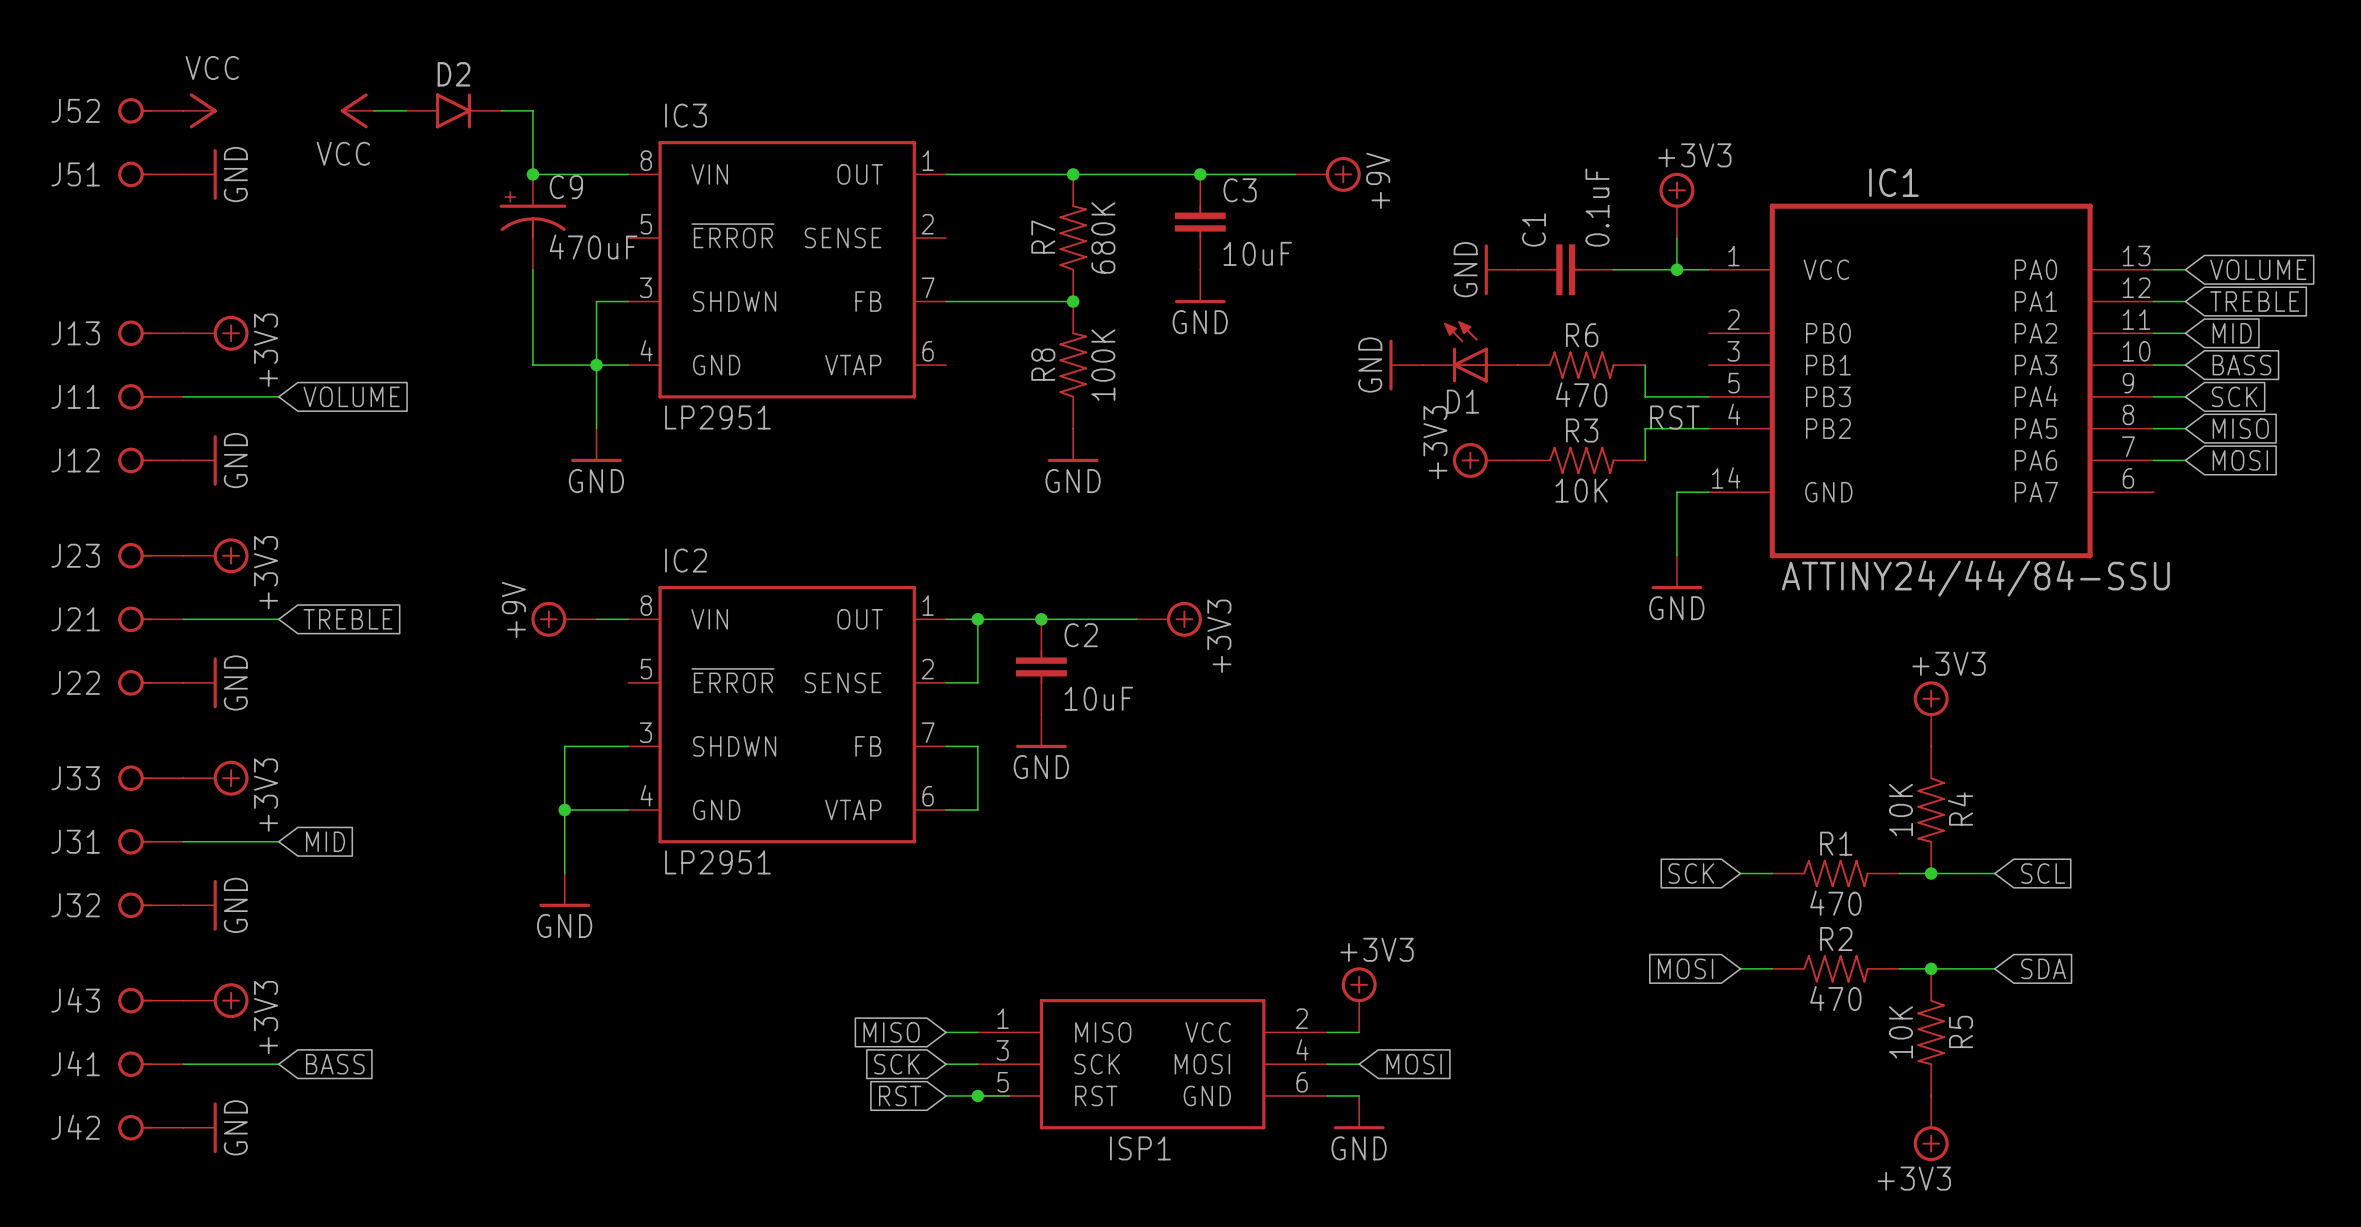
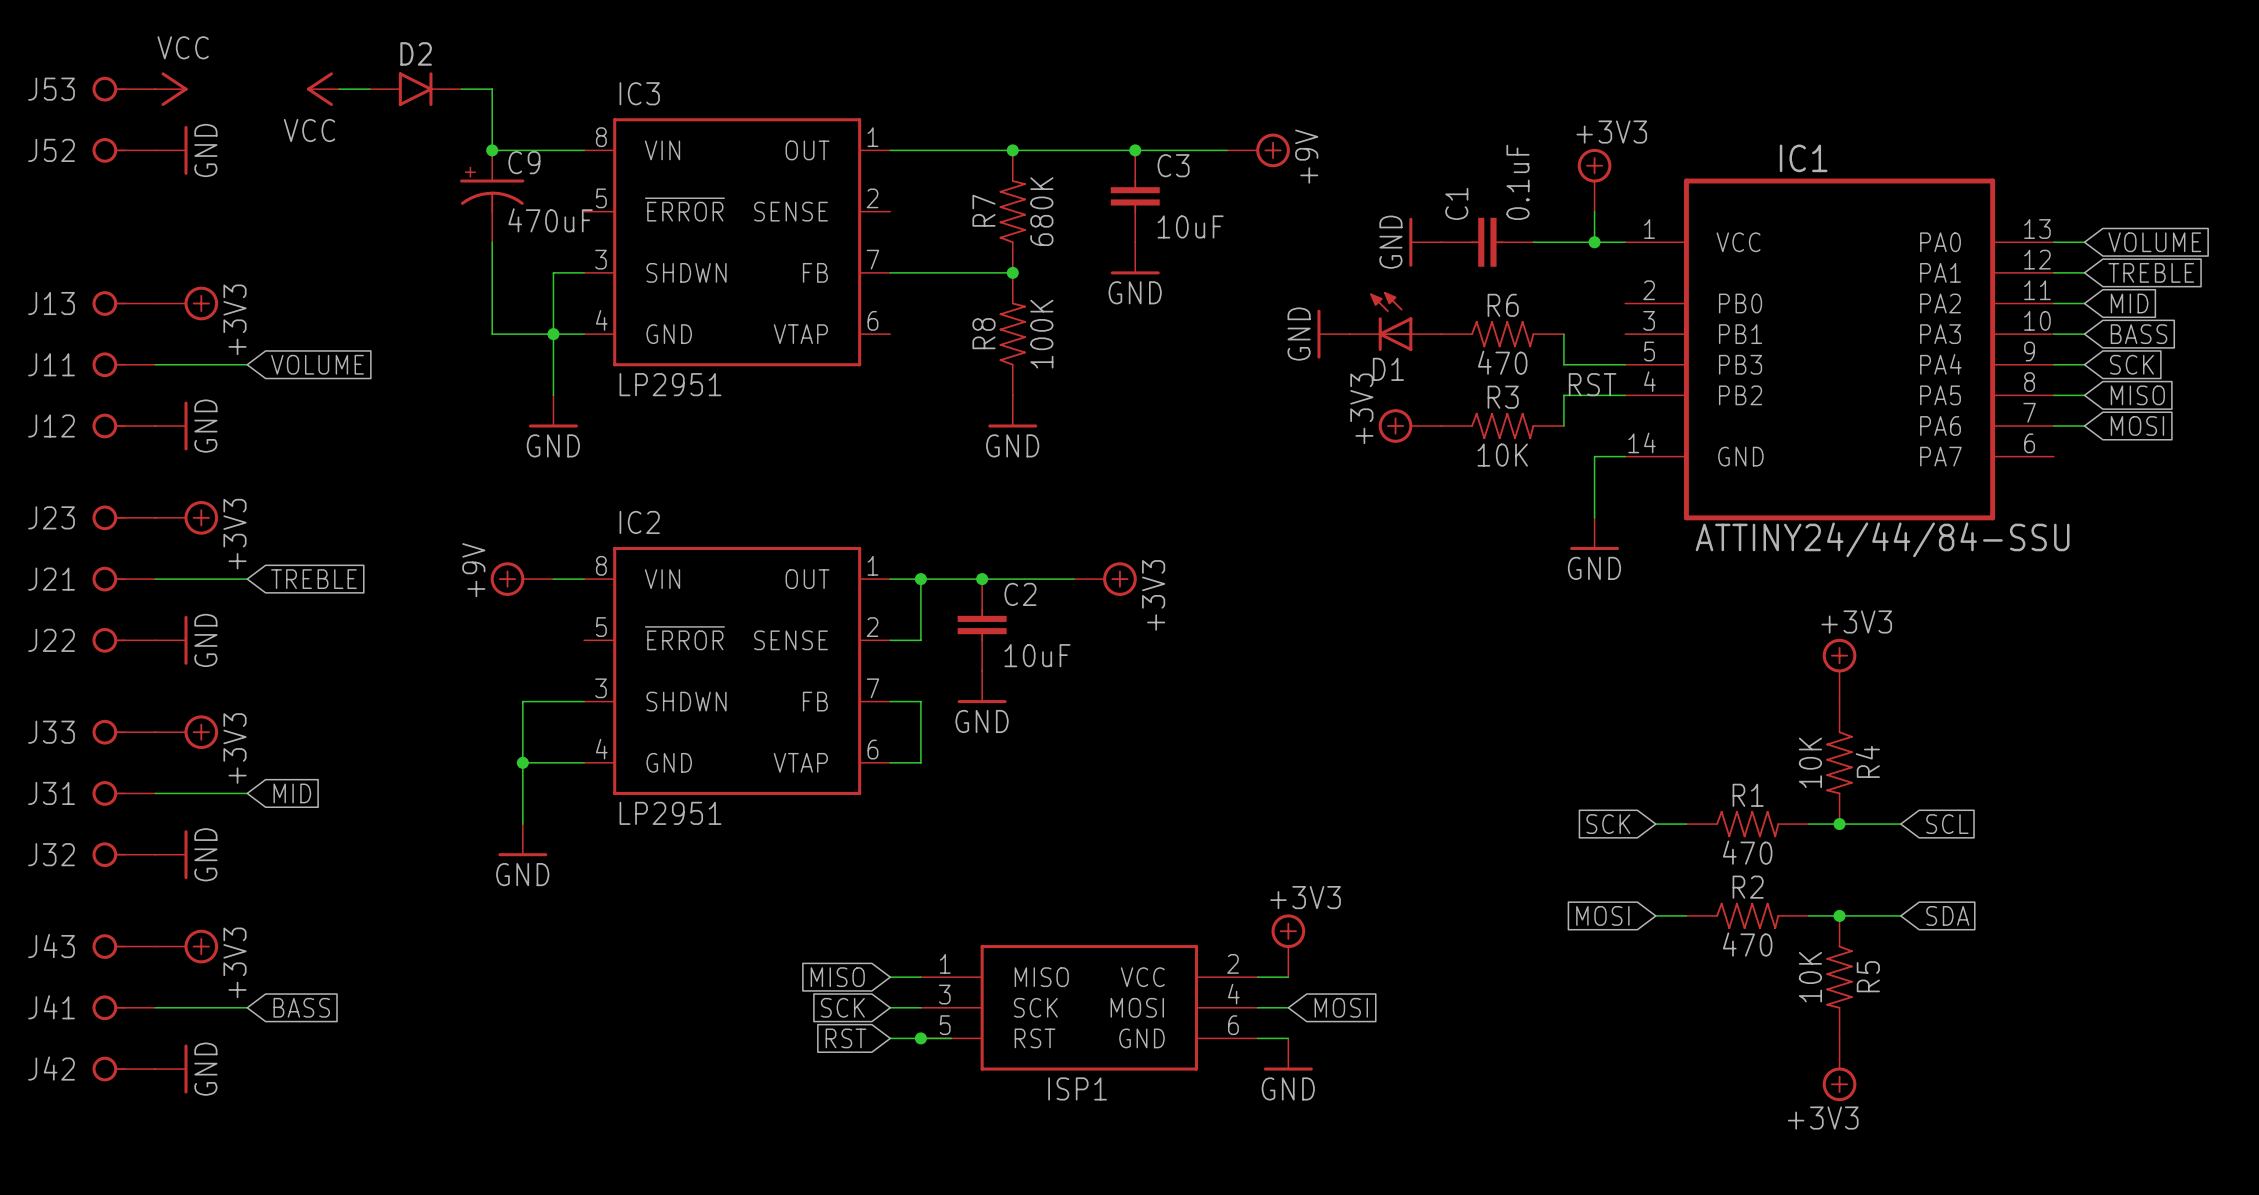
J52 name: J52 (75, 110) -> J53 (51, 89)
J51 name: J51 (75, 174) -> J52 (51, 150)

